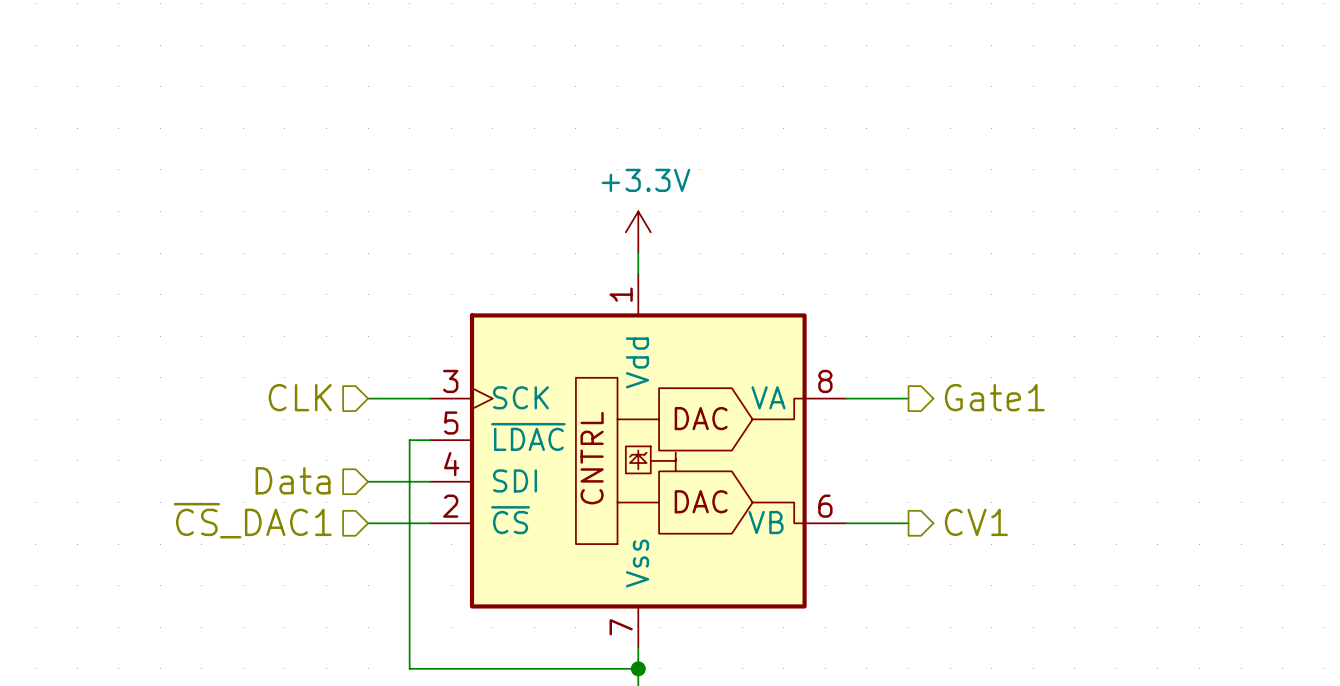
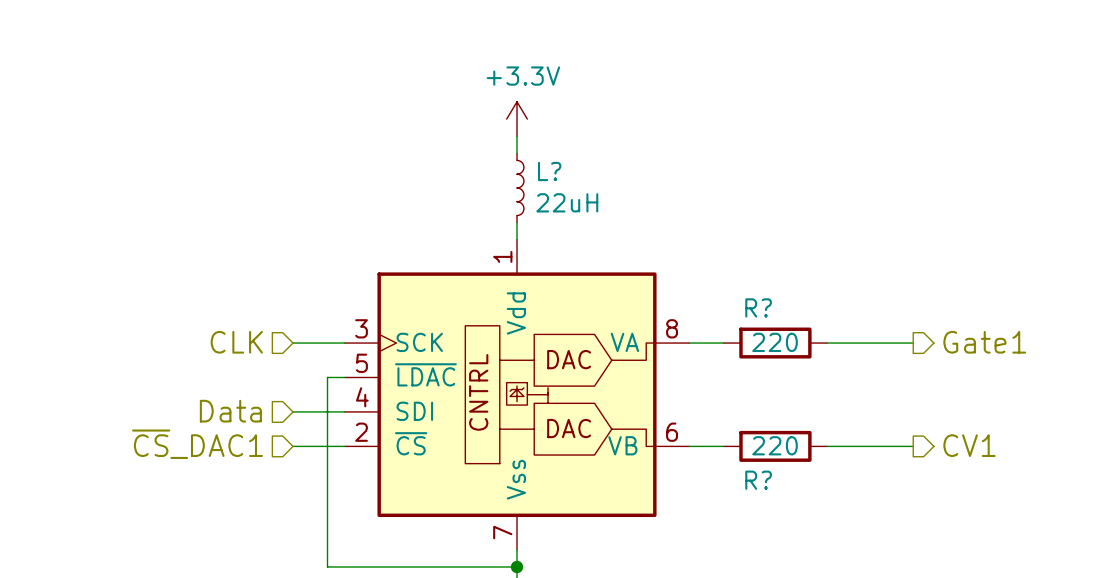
wire: none -> (517, 136) (517, 153)
L?: none -> 22uH (520, 187)
power symbol position: +3.3V (638, 232) -> +3.3V (517, 119)
hierarchical label position: Gate1 (994, 397) -> Gate1 (984, 342)
R?: none -> 220 (775, 343)
wire: none -> (827, 343) (913, 343)
hierarchical label position: CV1 (976, 522) -> CV1 (969, 445)
R?: none -> 220 (775, 446)
wire: none -> (827, 446) (913, 446)

